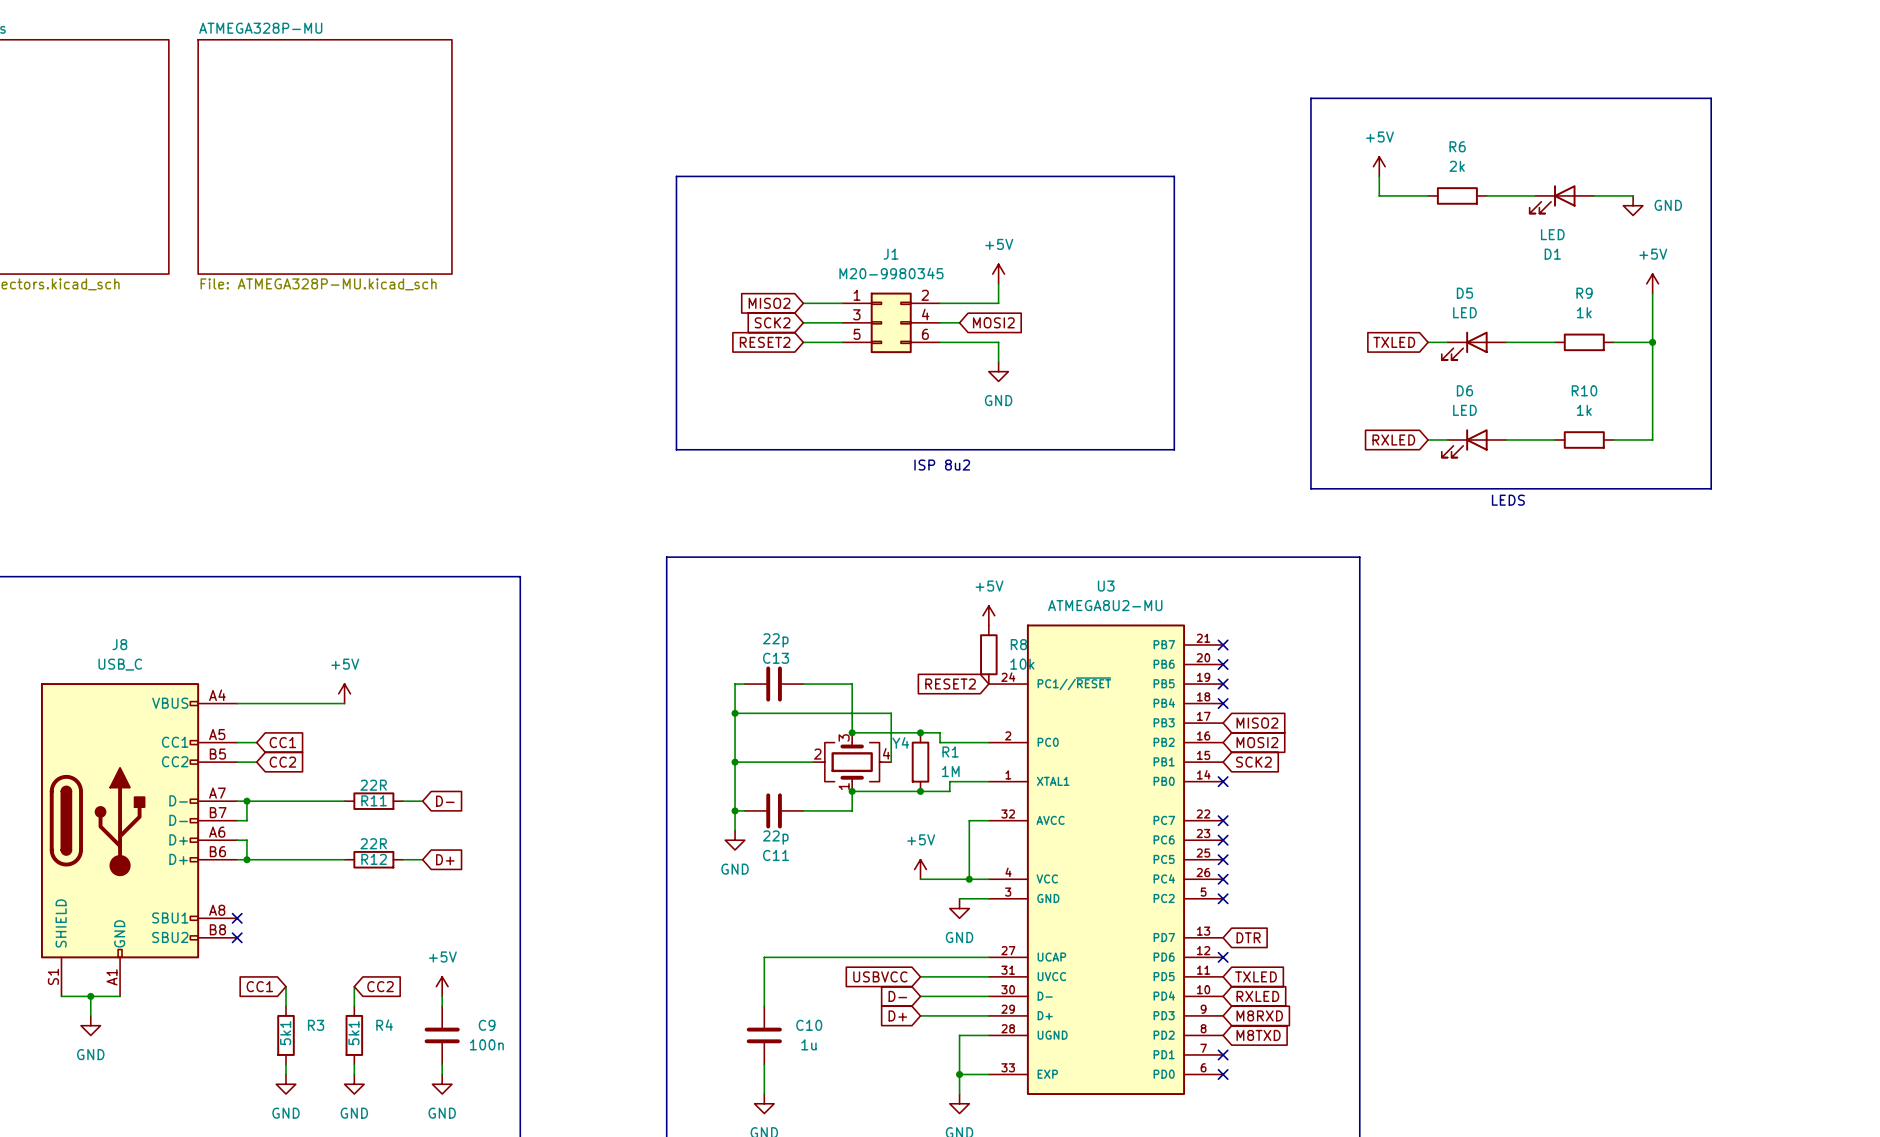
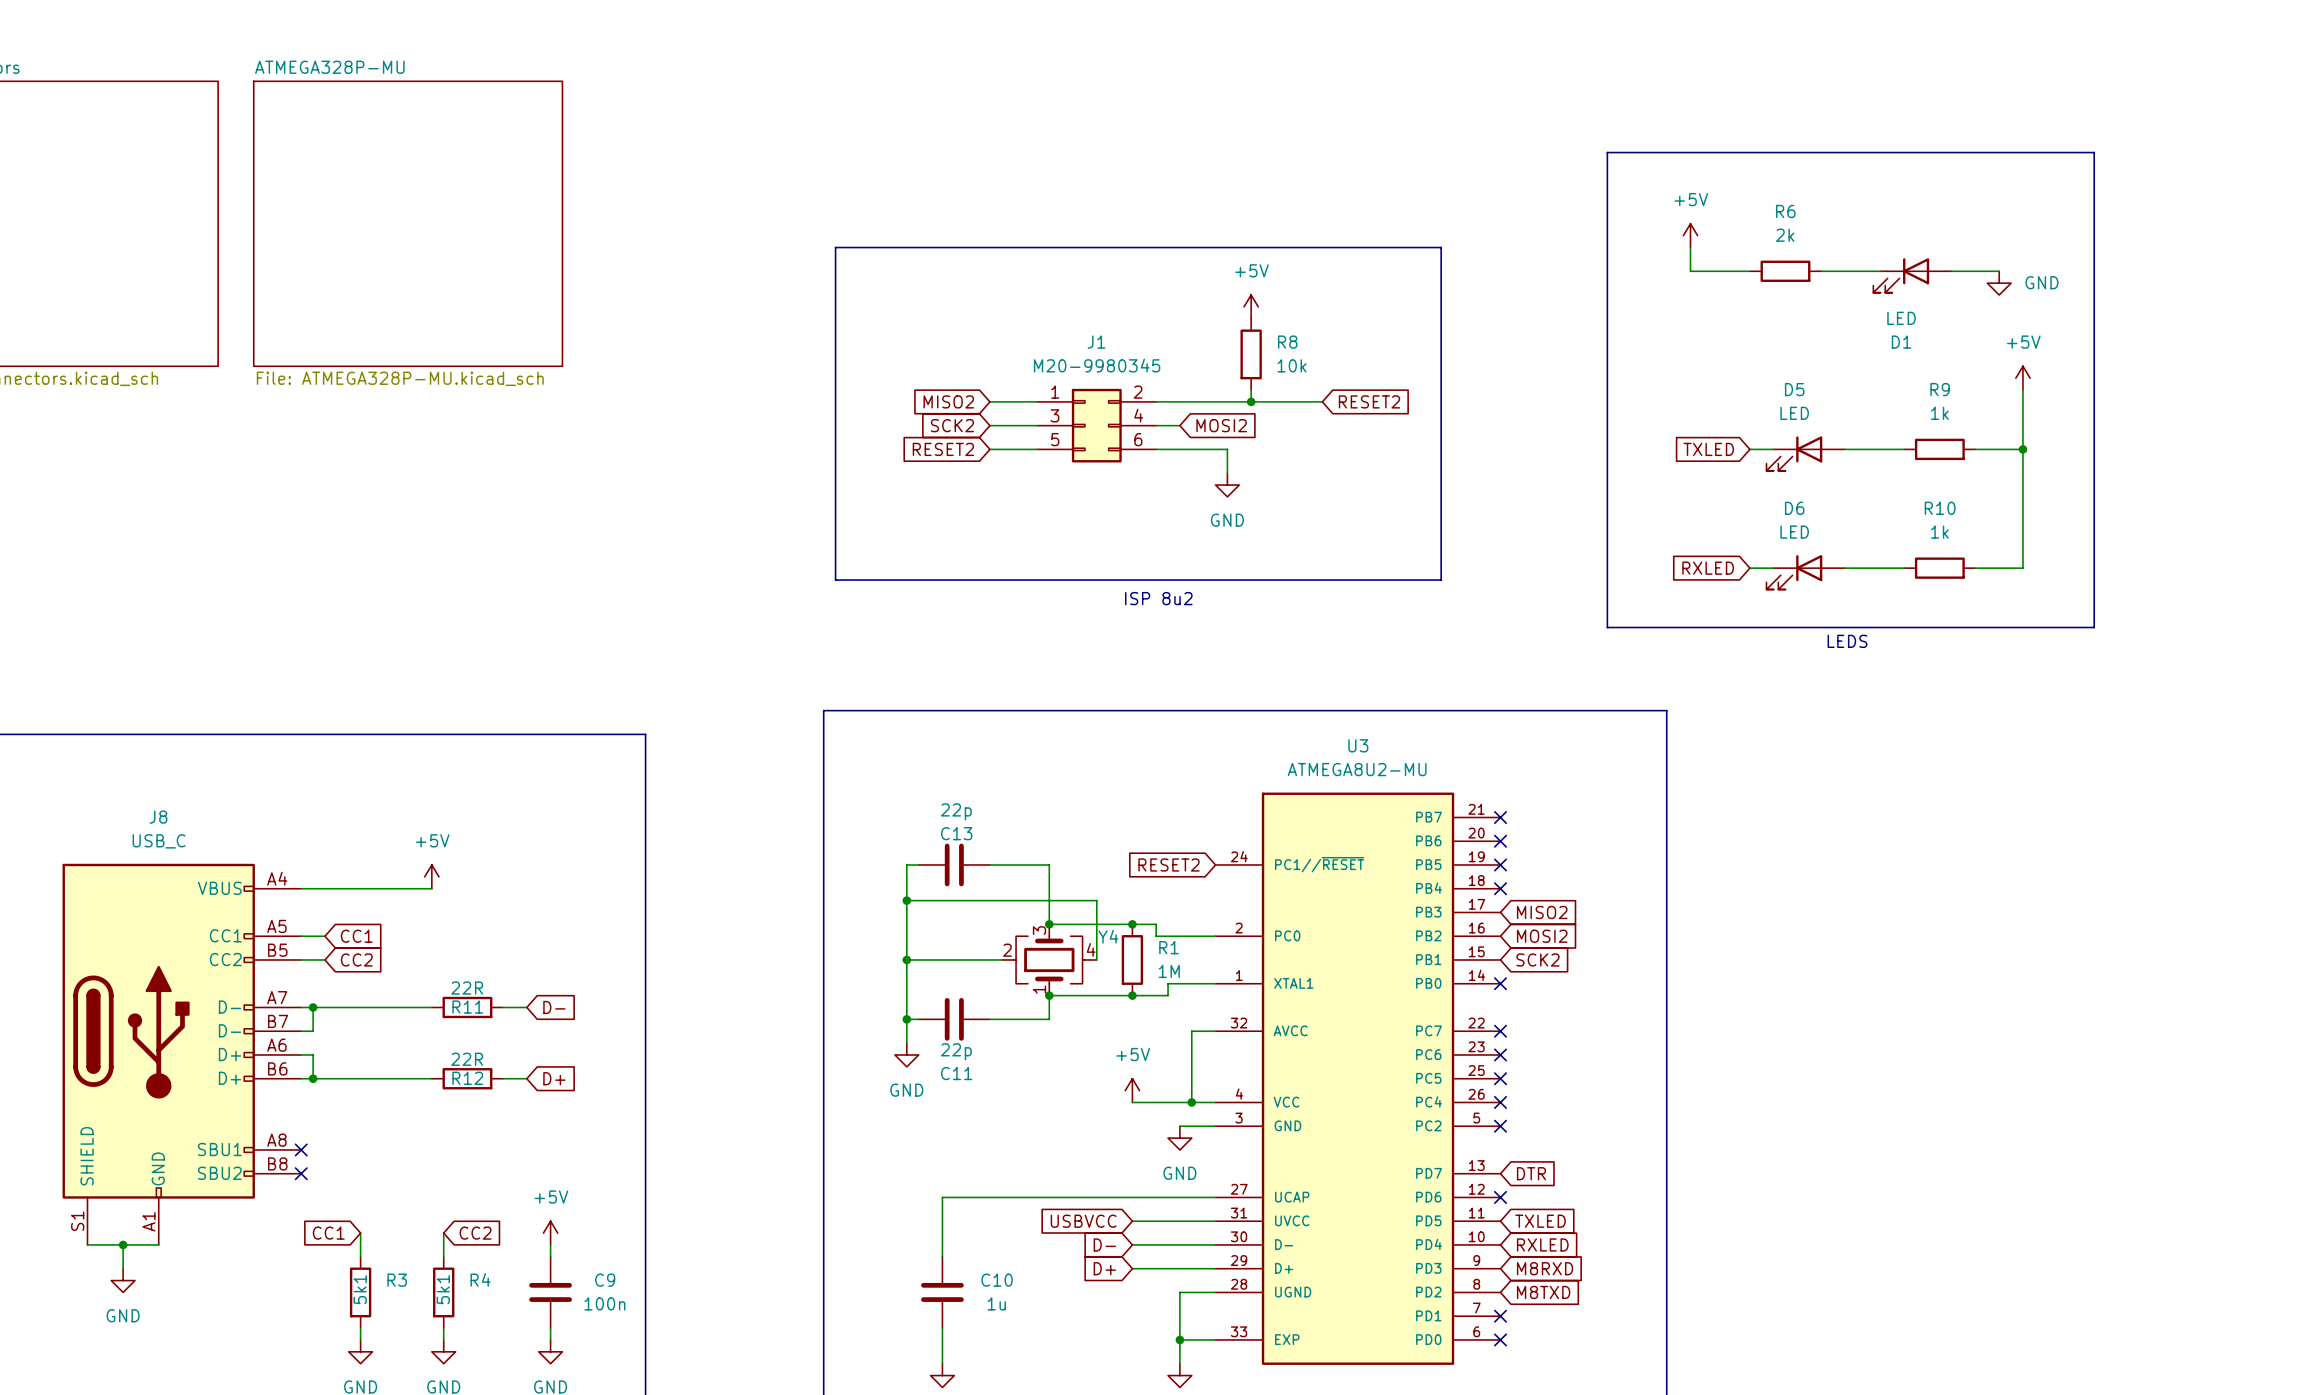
power symbol position: +5V (998, 274) -> +5V (1251, 306)
wire: (998, 283) (998, 303) -> (1322, 401) (1227, 401)
wire: none -> (1251, 390) (1251, 401)
junction: none -> (1251, 401)
global label: none -> RESET2 (1369, 401)
power symbol: +5V (988, 615) -> none
R8 position: (988, 654) -> (1251, 354)

